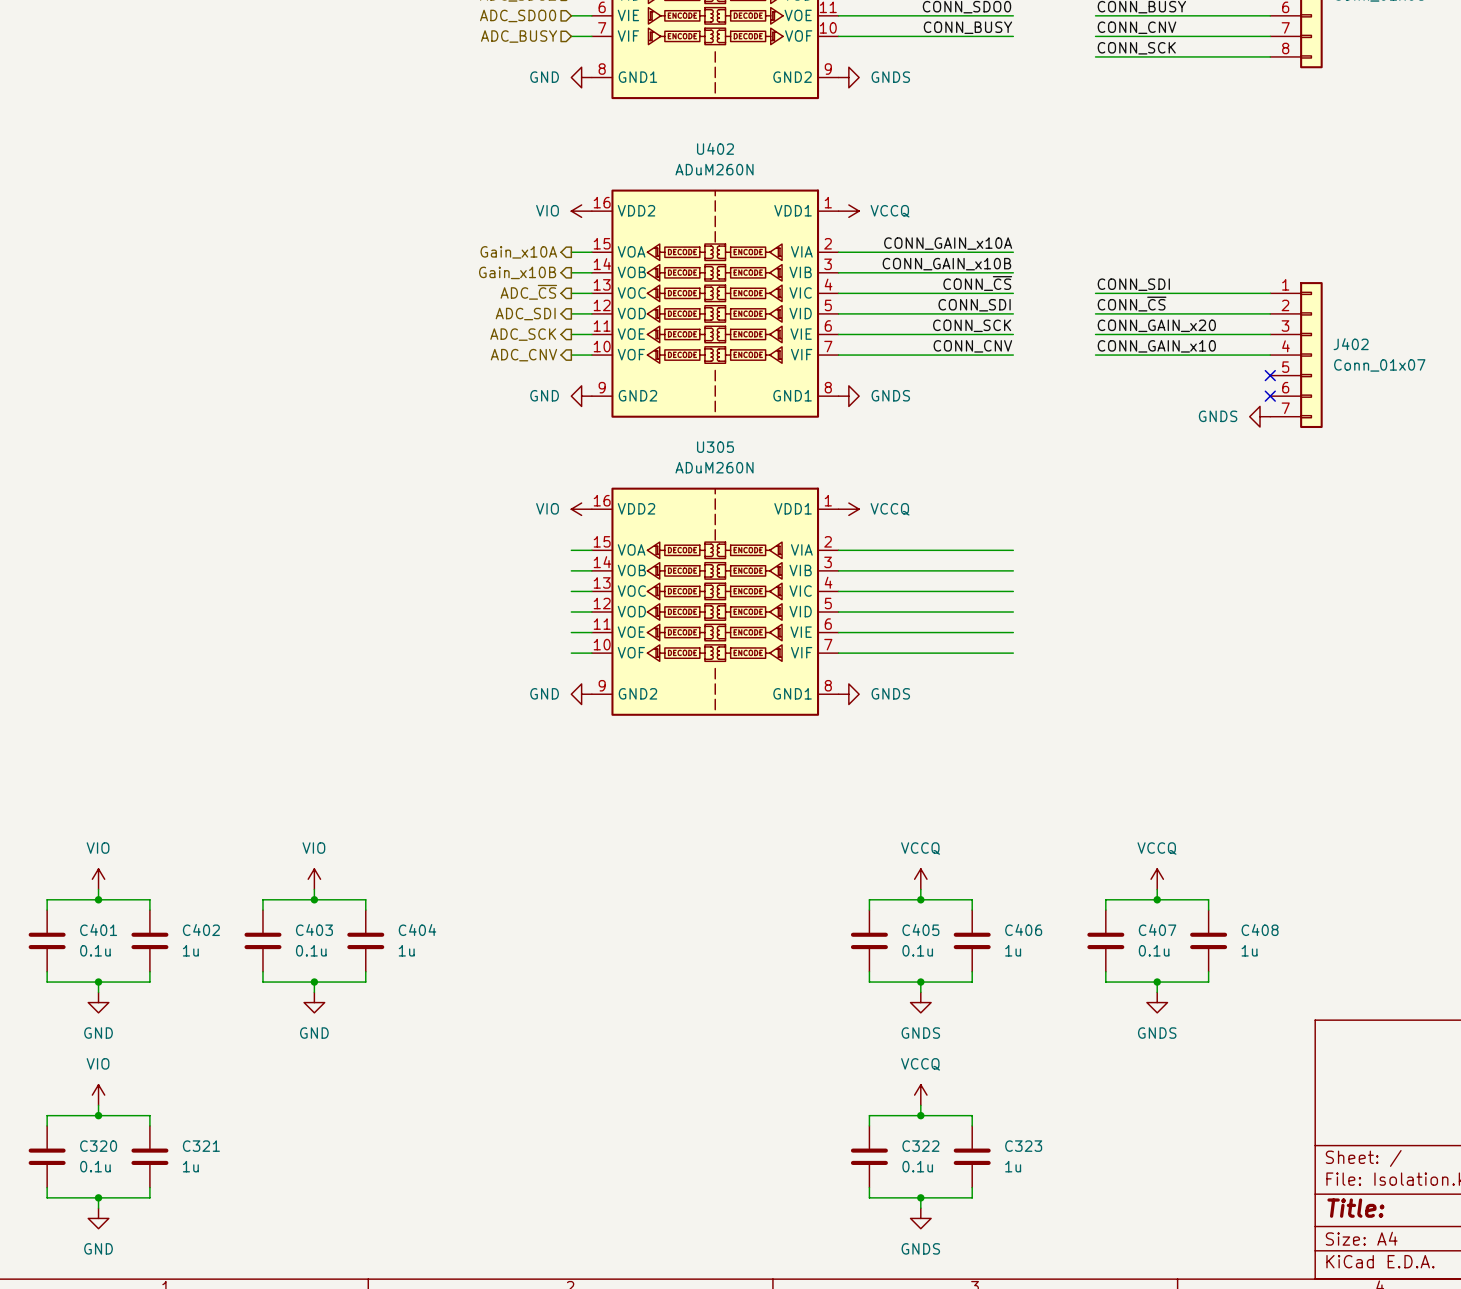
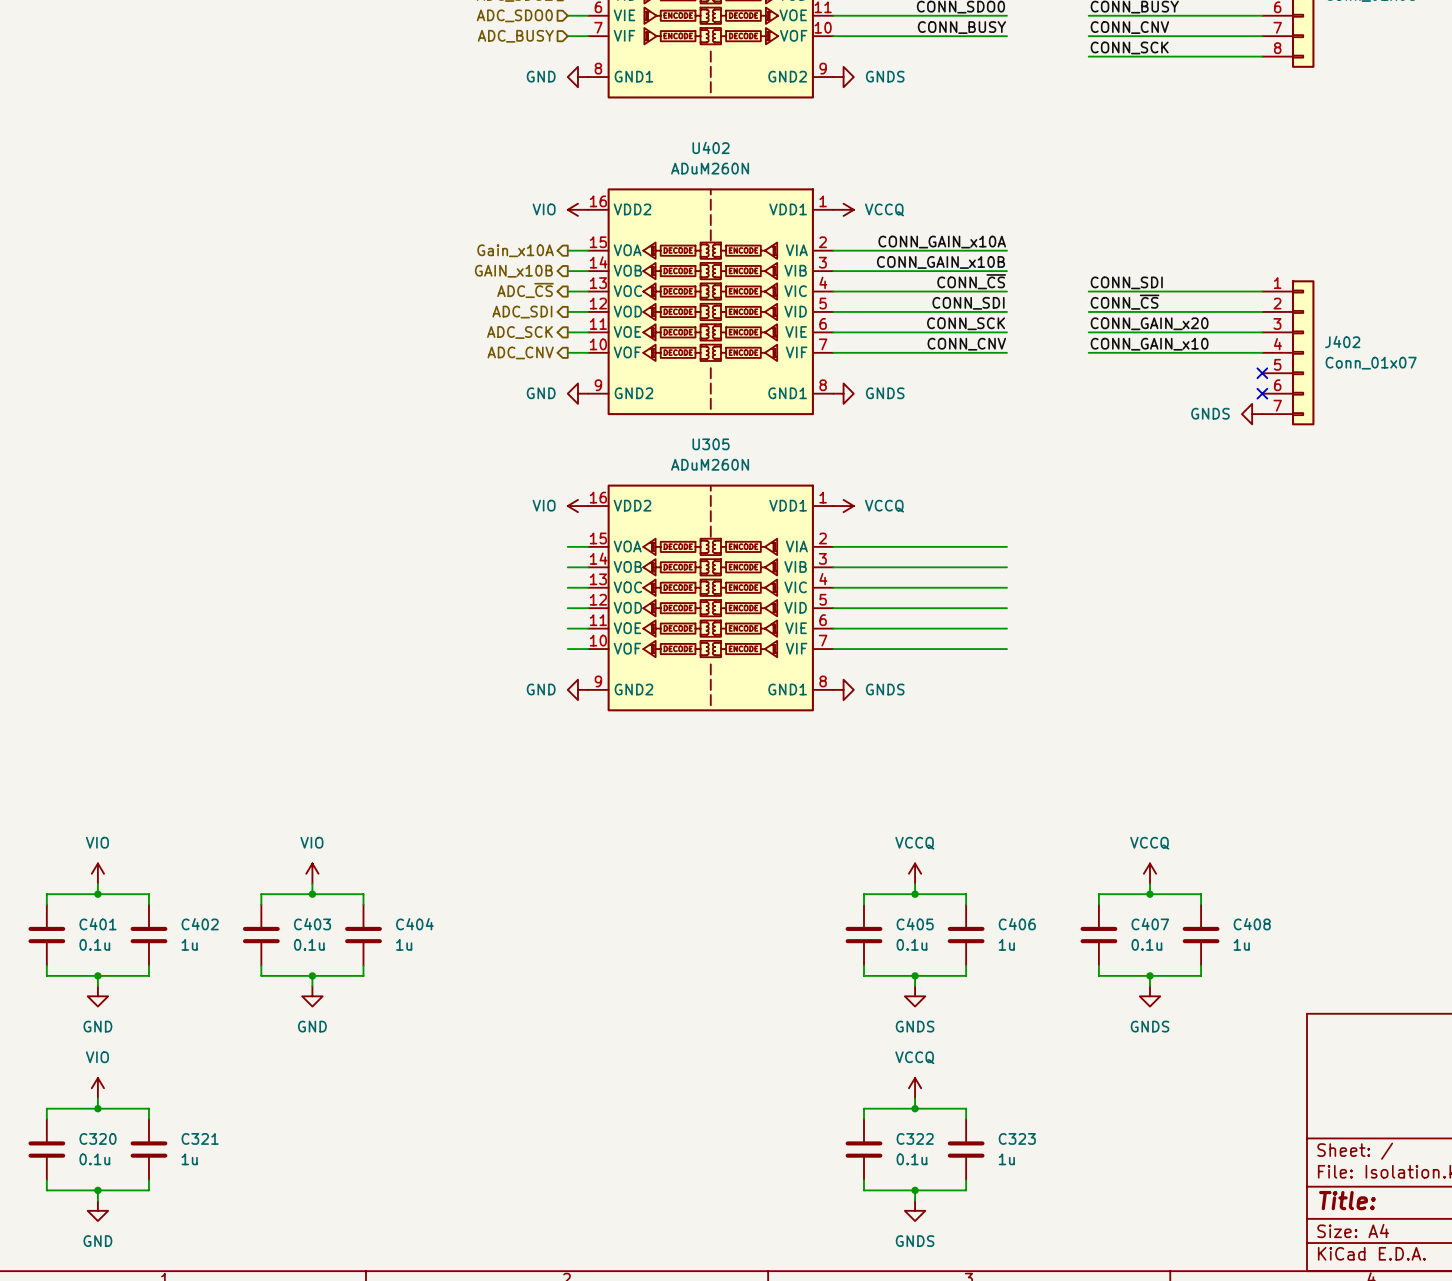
hierarchical label: Gain_x10B (517, 272) -> GAIN_x10B (513, 271)

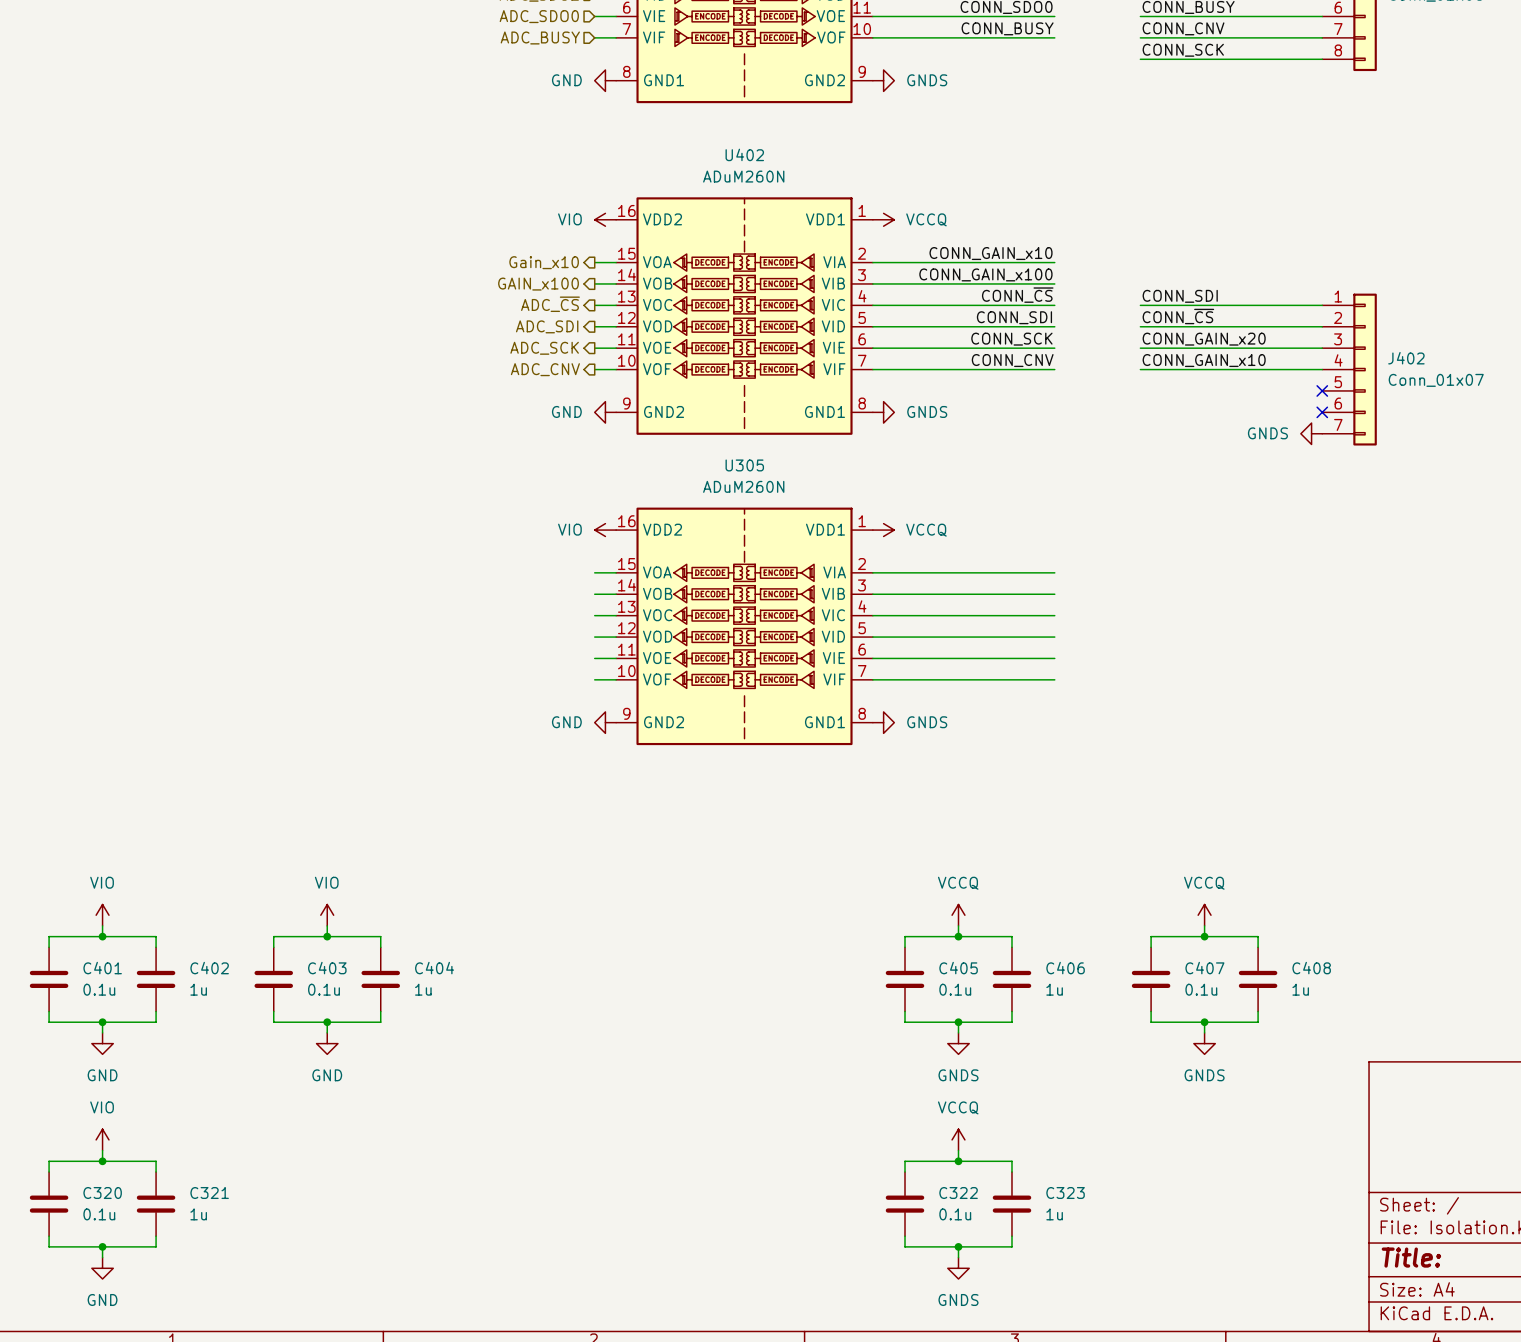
label: CONN_GAIN_x10A (942, 242) -> CONN_GAIN_x10 (991, 253)
hierarchical label: Gain_x10A (515, 250) -> Gain_x10 (544, 262)
label: CONN_GAIN_x10B (941, 262) -> CONN_GAIN_x100 (985, 274)
hierarchical label: GAIN_x10B (513, 271) -> GAIN_x100 (538, 284)

